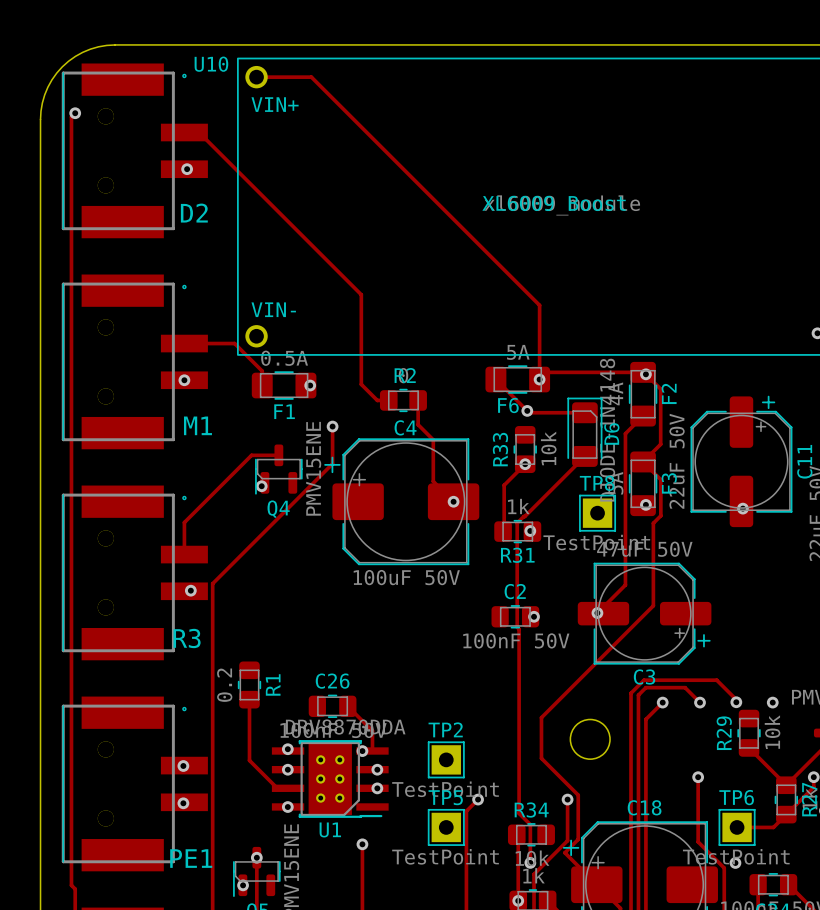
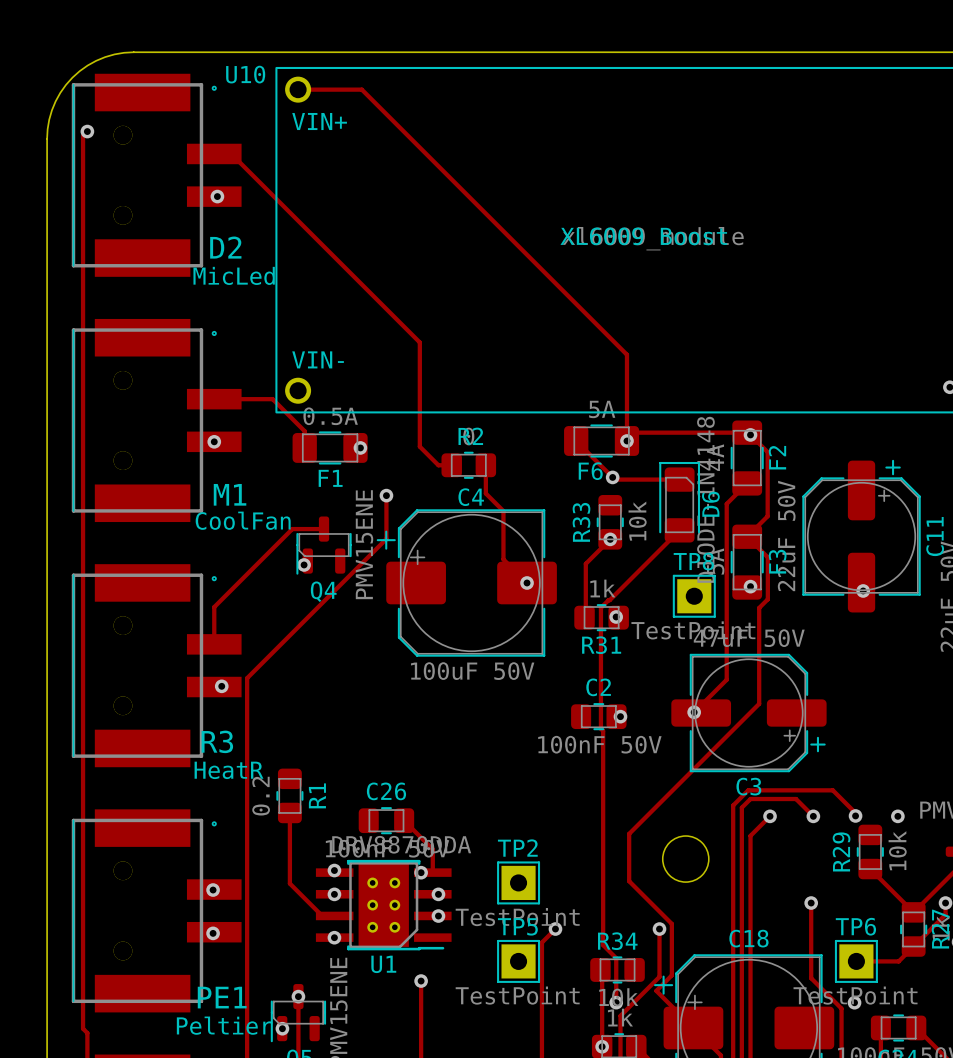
text: none -> MicLed (234, 275)
text: none -> CoolFan (243, 520)
text: none -> HeatR (229, 770)
text: none -> Peltier (224, 1025)

